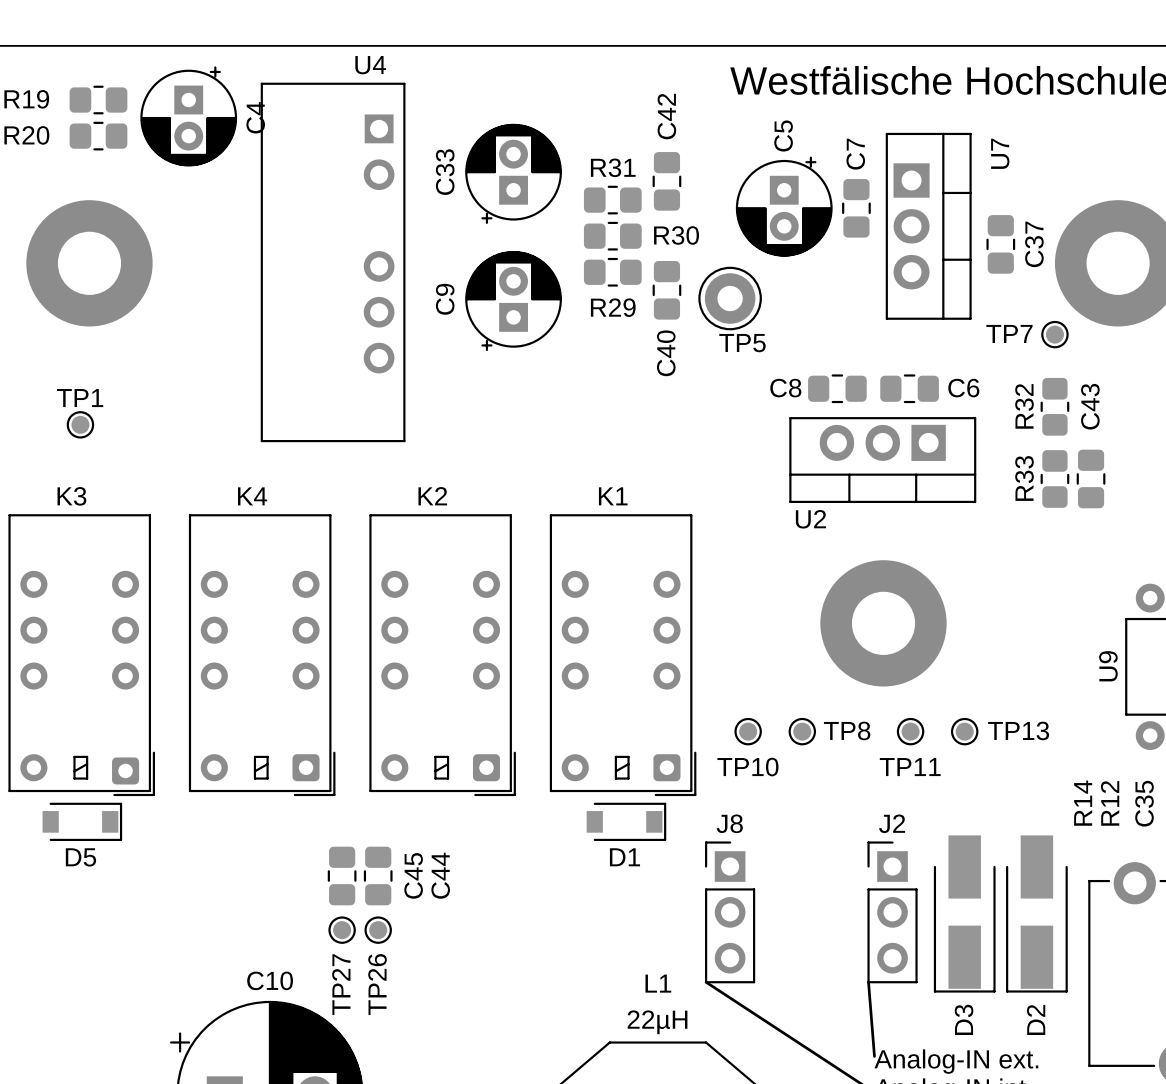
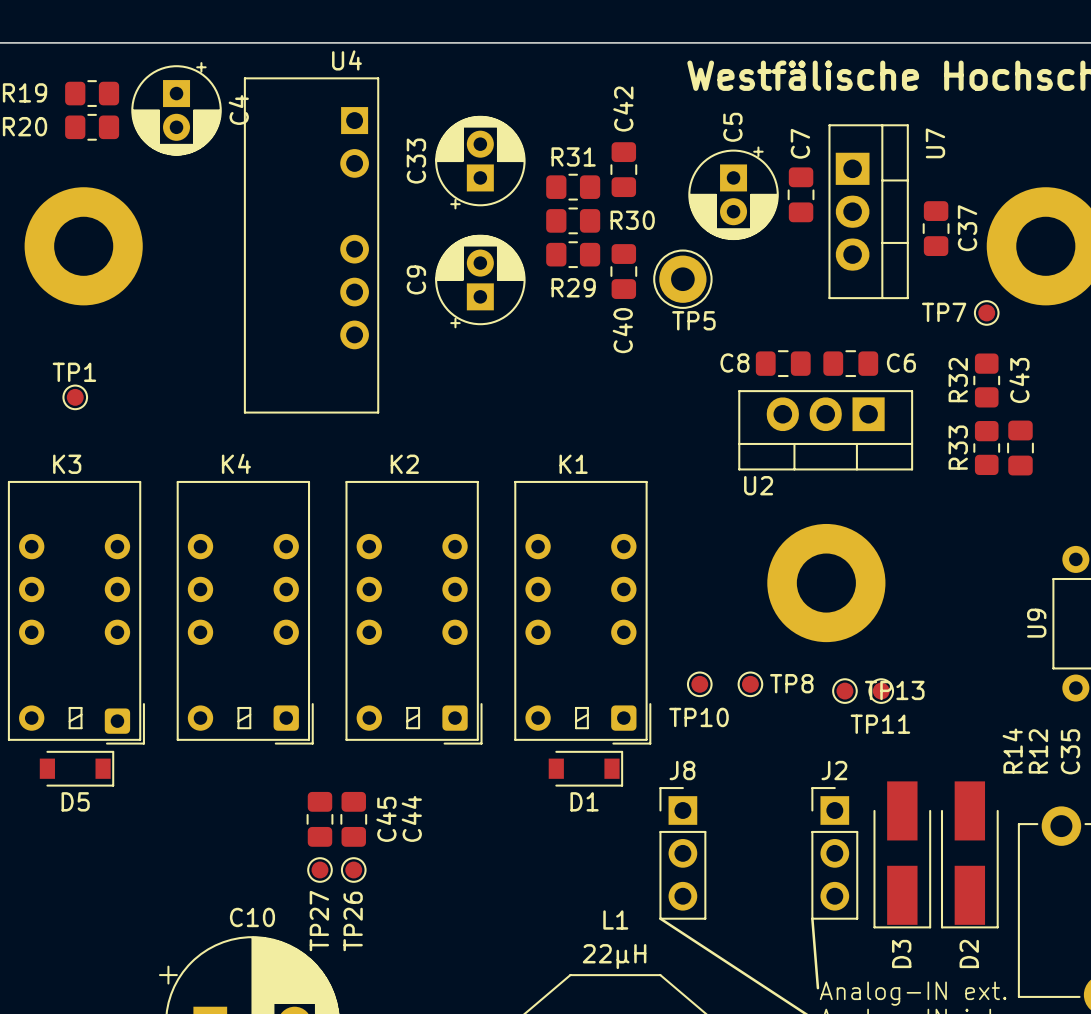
TP11 position: (910, 731) -> (881, 691)
TP13 position: (964, 731) -> (844, 691)

